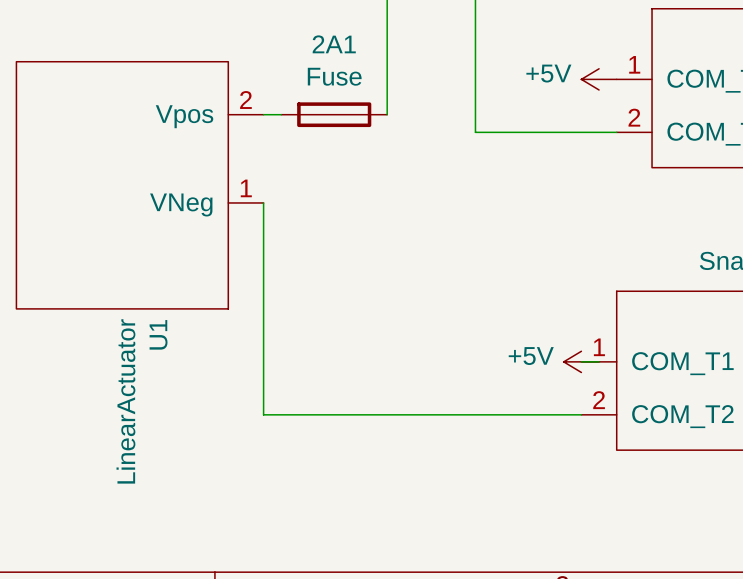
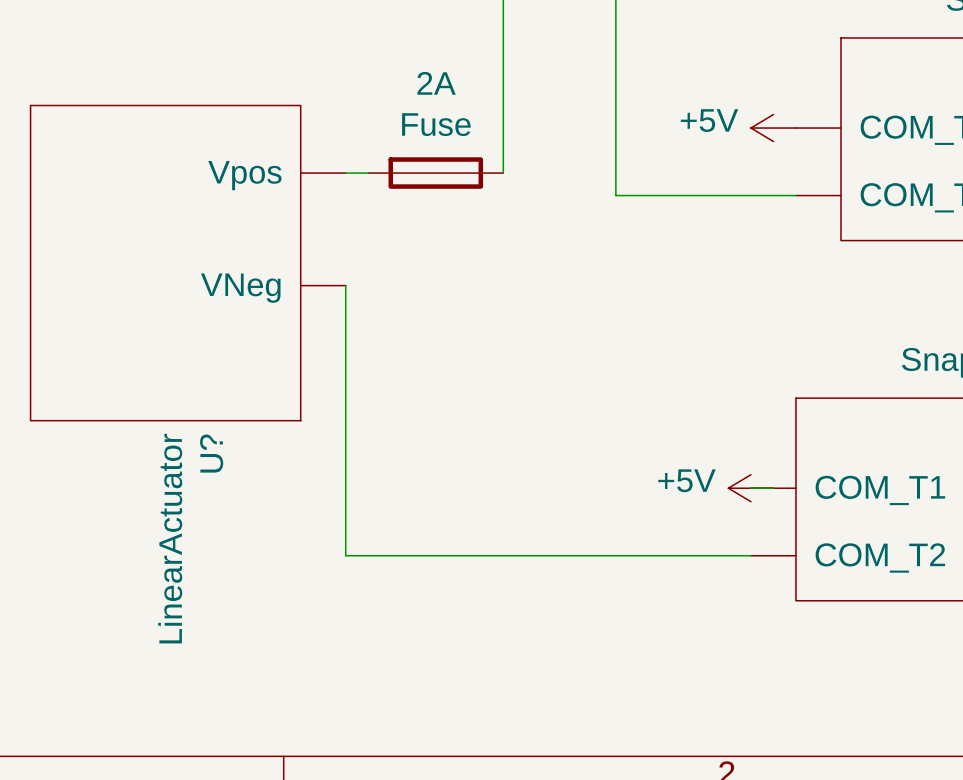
2A1 name: 2A1 (334, 44) -> 2A (436, 83)
part pin number: 1 (634, 64) -> none
U1 pin number: 2 (245, 100) -> none
part pin number: 2 (634, 117) -> none
U1 pin number: 1 (246, 188) -> none
U1 name: U1 (158, 334) -> U? (211, 453)
part pin number: 1 (599, 347) -> none
part pin number: 2 (599, 400) -> none

